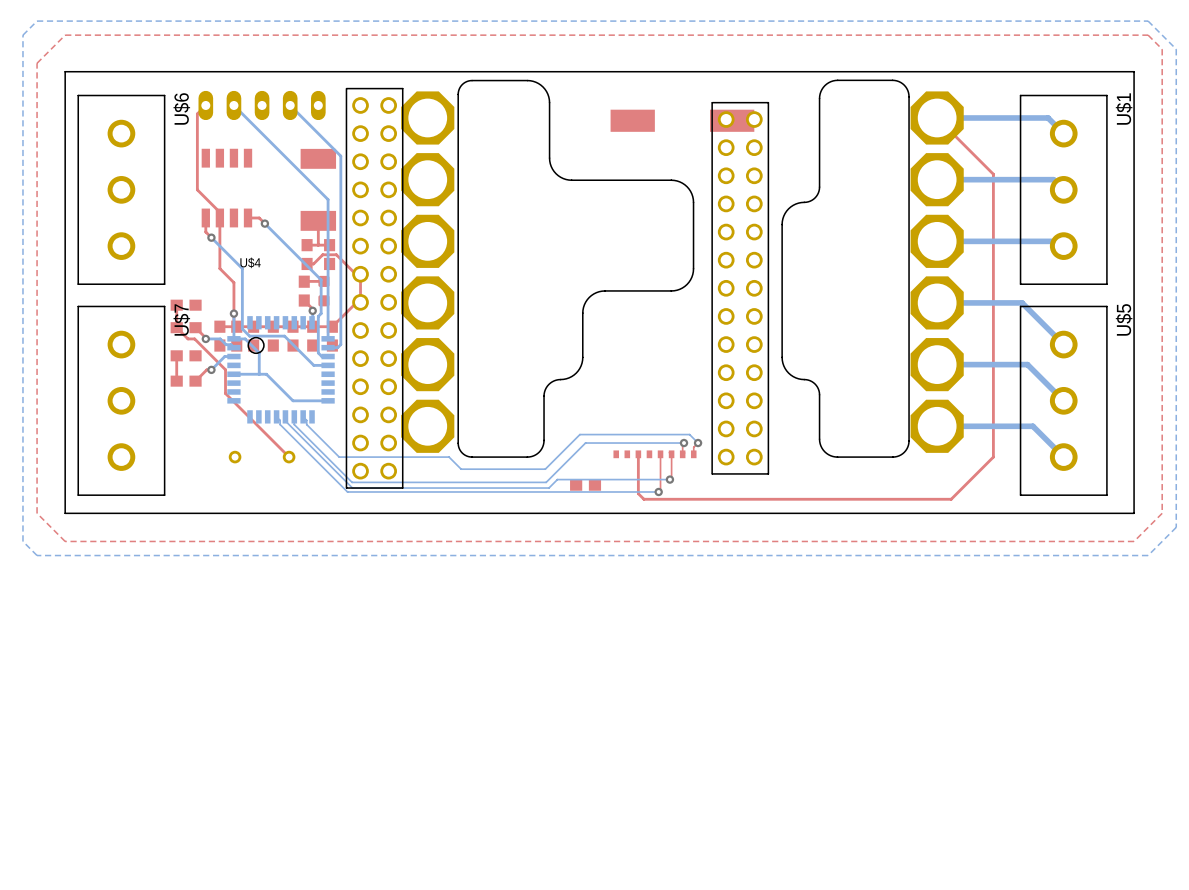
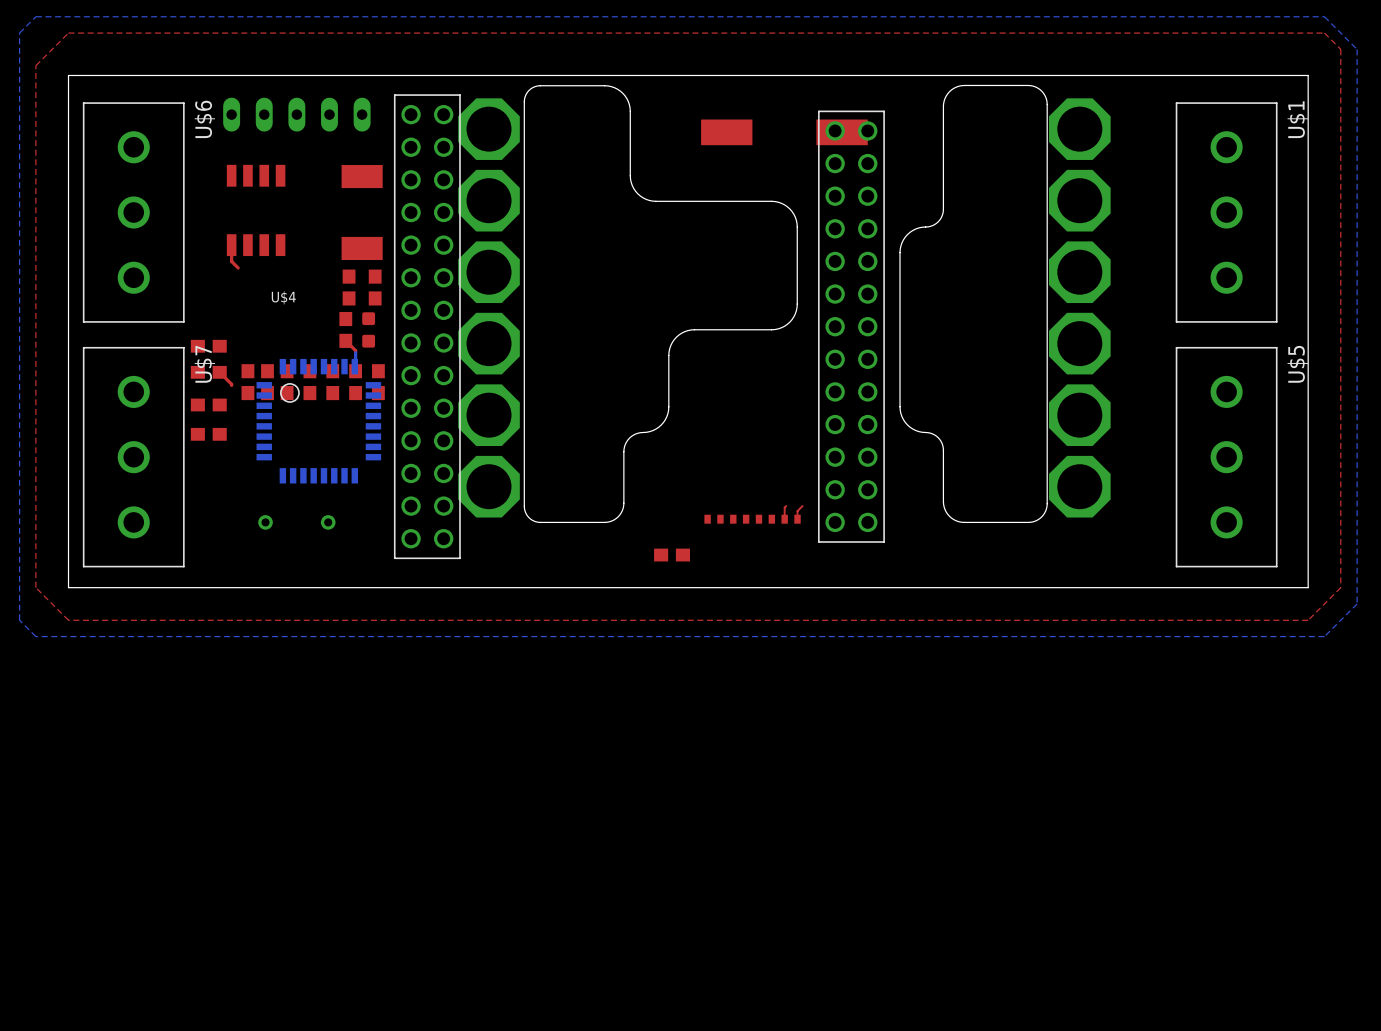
top track: (205, 105) (197, 113) (197, 189) (219, 212) (219, 268) (233, 282) (233, 323) (236, 326) -> none
bottom track: (233, 105) (328, 199) (328, 338) -> none
bottom track: (290, 105) (340, 156) (340, 344) (337, 347) (328, 347) -> none
top track: (937, 117) (993, 174) (993, 457) (951, 499) (643, 499) (638, 493) (638, 454) -> none
bottom track: (937, 117) (1048, 117) (1063, 133) -> none
bottom track: (937, 179) (1053, 179) (1063, 189) -> none
top track: (248, 217) (259, 217) (264, 223) -> none
top track: (318, 220) (318, 245) -> none
bottom track: (264, 223) (321, 279) (318, 353) (321, 356) (328, 356) -> none
via: (264, 223) -> none
bottom track: (211, 237) (242, 268) (242, 328) (249, 336) (284, 336) (313, 365) (328, 365) -> none
via: (211, 237) -> none
bottom track: (937, 241) (1058, 241) (1063, 246) -> none
top track: (329, 245) (307, 245) -> none
top track: (307, 263) (313, 263) (322, 254) (336, 254) (355, 274) (360, 274) (360, 302) (356, 302) (332, 326) (219, 326) -> none
top track: (323, 281) (304, 281) -> none
bottom track: (937, 302) (1022, 302) (1063, 344) -> none
top track: (176, 305) (176, 327) (187, 338) (194, 338) (225, 369) (225, 393) (289, 457) -> none
via: (312, 310) -> none
bottom track: (233, 313) (233, 338) -> none
via: (233, 313) -> none
bottom track: (205, 338) (220, 338) (226, 344) (230, 344) (233, 347) -> none
via: (205, 338) -> none
bottom track: (234, 338) (245, 338) (259, 353) (259, 374) -> none
top track: (176, 355) (176, 381) -> none
bottom track: (233, 356) (224, 356) (211, 369) -> none
bottom track: (937, 364) (1027, 364) (1063, 400) -> none
top track: (211, 369) (206, 369) (195, 381) -> none
via: (211, 369) -> none
bottom track: (233, 374) (266, 374) (293, 400) (328, 400) -> none
bottom track: (276, 416) (280, 420) (280, 424) (347, 491) (658, 491) -> none
bottom track: (285, 416) (286, 421) (352, 488) (548, 488) (557, 479) (669, 479) -> none
bottom track: (294, 416) (294, 424) (352, 482) (546, 482) (585, 443) (684, 443) -> none
bottom track: (303, 416) (306, 420) (306, 424) (339, 457) (449, 457) (461, 469) (545, 469) (579, 434) (689, 434) (698, 443) -> none
bottom track: (937, 426) (1032, 426) (1063, 457) -> none
via: (684, 443) -> none
via: (698, 443) -> none
top track: (669, 452) (671, 454) (671, 477) (669, 479) -> none
top track: (660, 454) (660, 490) (658, 491) -> none
via: (669, 479) -> none
via: (658, 491) -> none

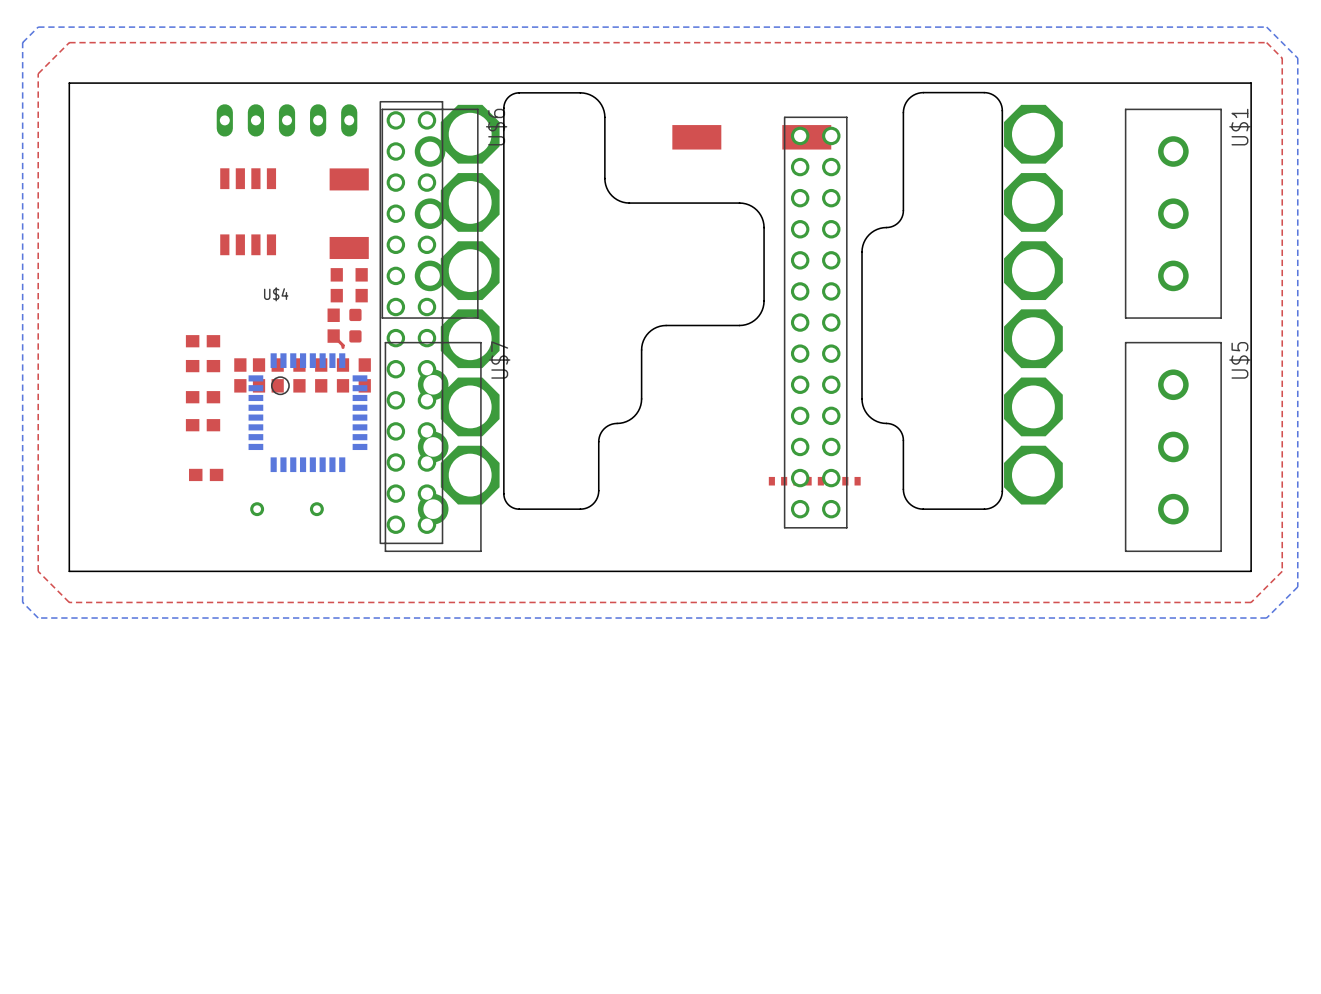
U$6 position: (133, 212) -> (430, 213)
top track: (231, 245) (231, 261) (238, 267) -> none
bottom track: (355, 352) (354, 366) -> none
top track: (219, 372) (231, 385) -> none
U$7 position: (133, 457) -> (433, 446)
part: none -> (206, 474)
top track: (786, 506) (784, 519) (786, 517) -> none
top track: (802, 506) (797, 511) (797, 519) -> none
part position: (752, 519) -> (814, 481)
part: (672, 555) -> none

